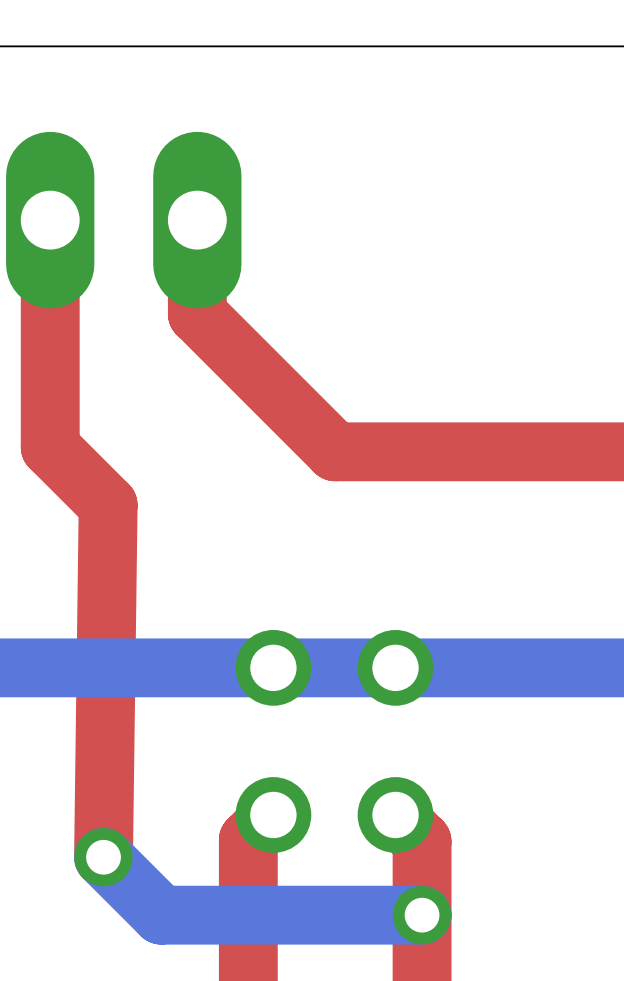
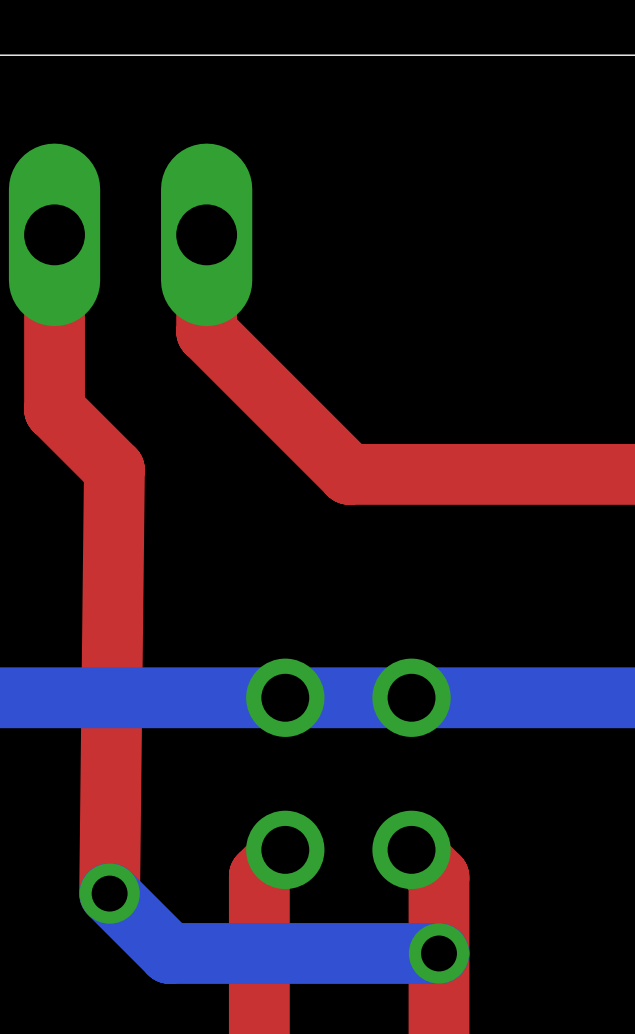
top track: (50, 389) (50, 447) (108, 505) (103, 857) -> (54, 409) (114, 469) (109, 893)

